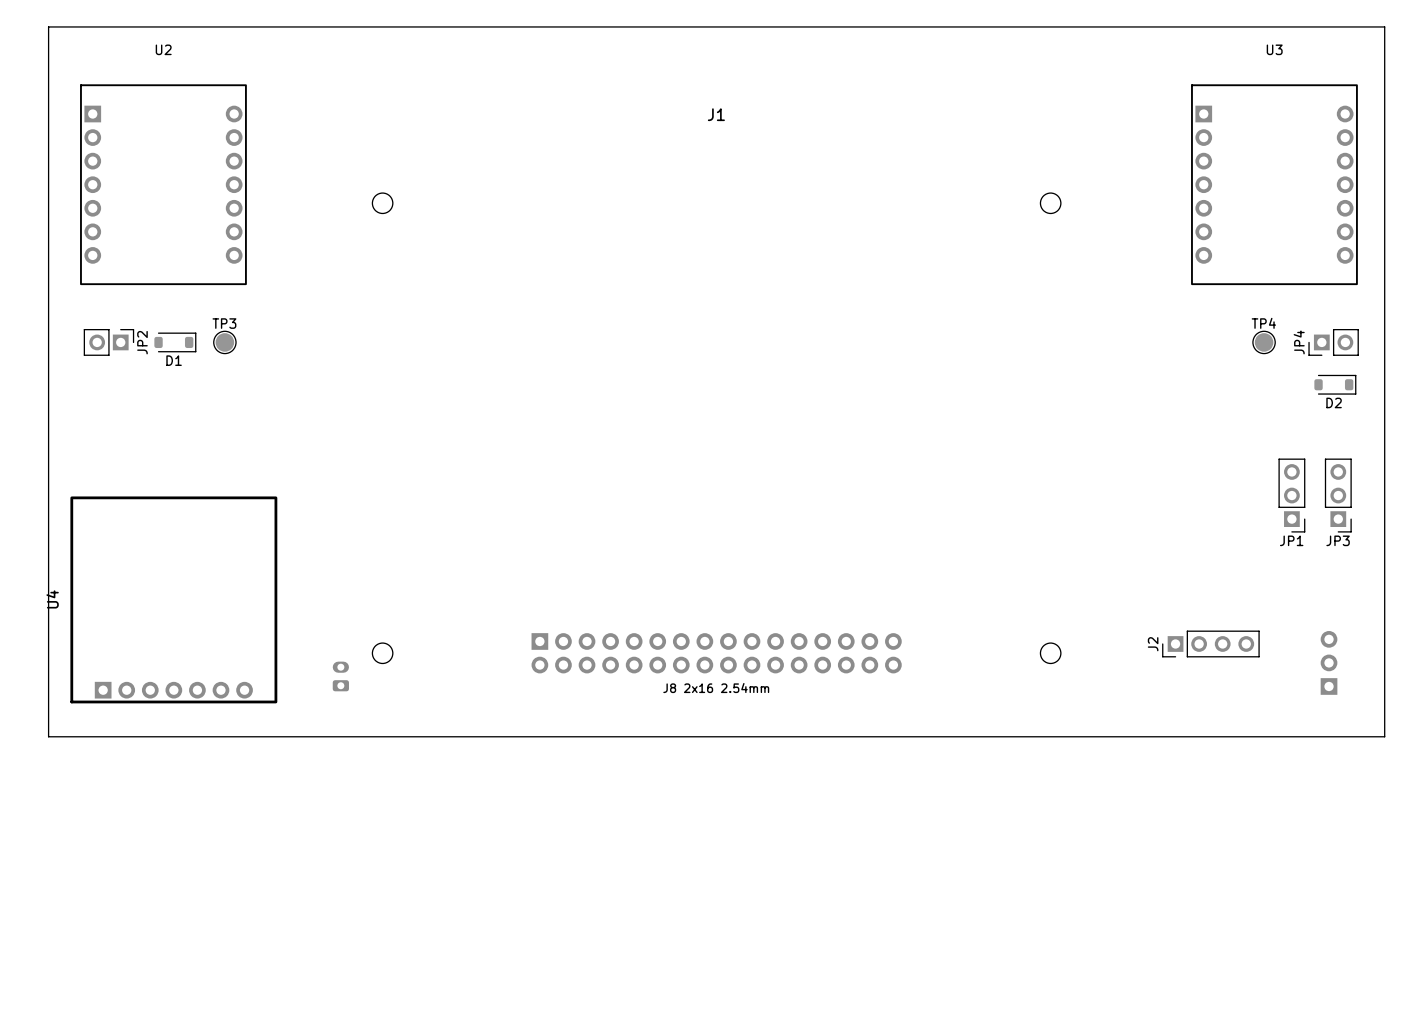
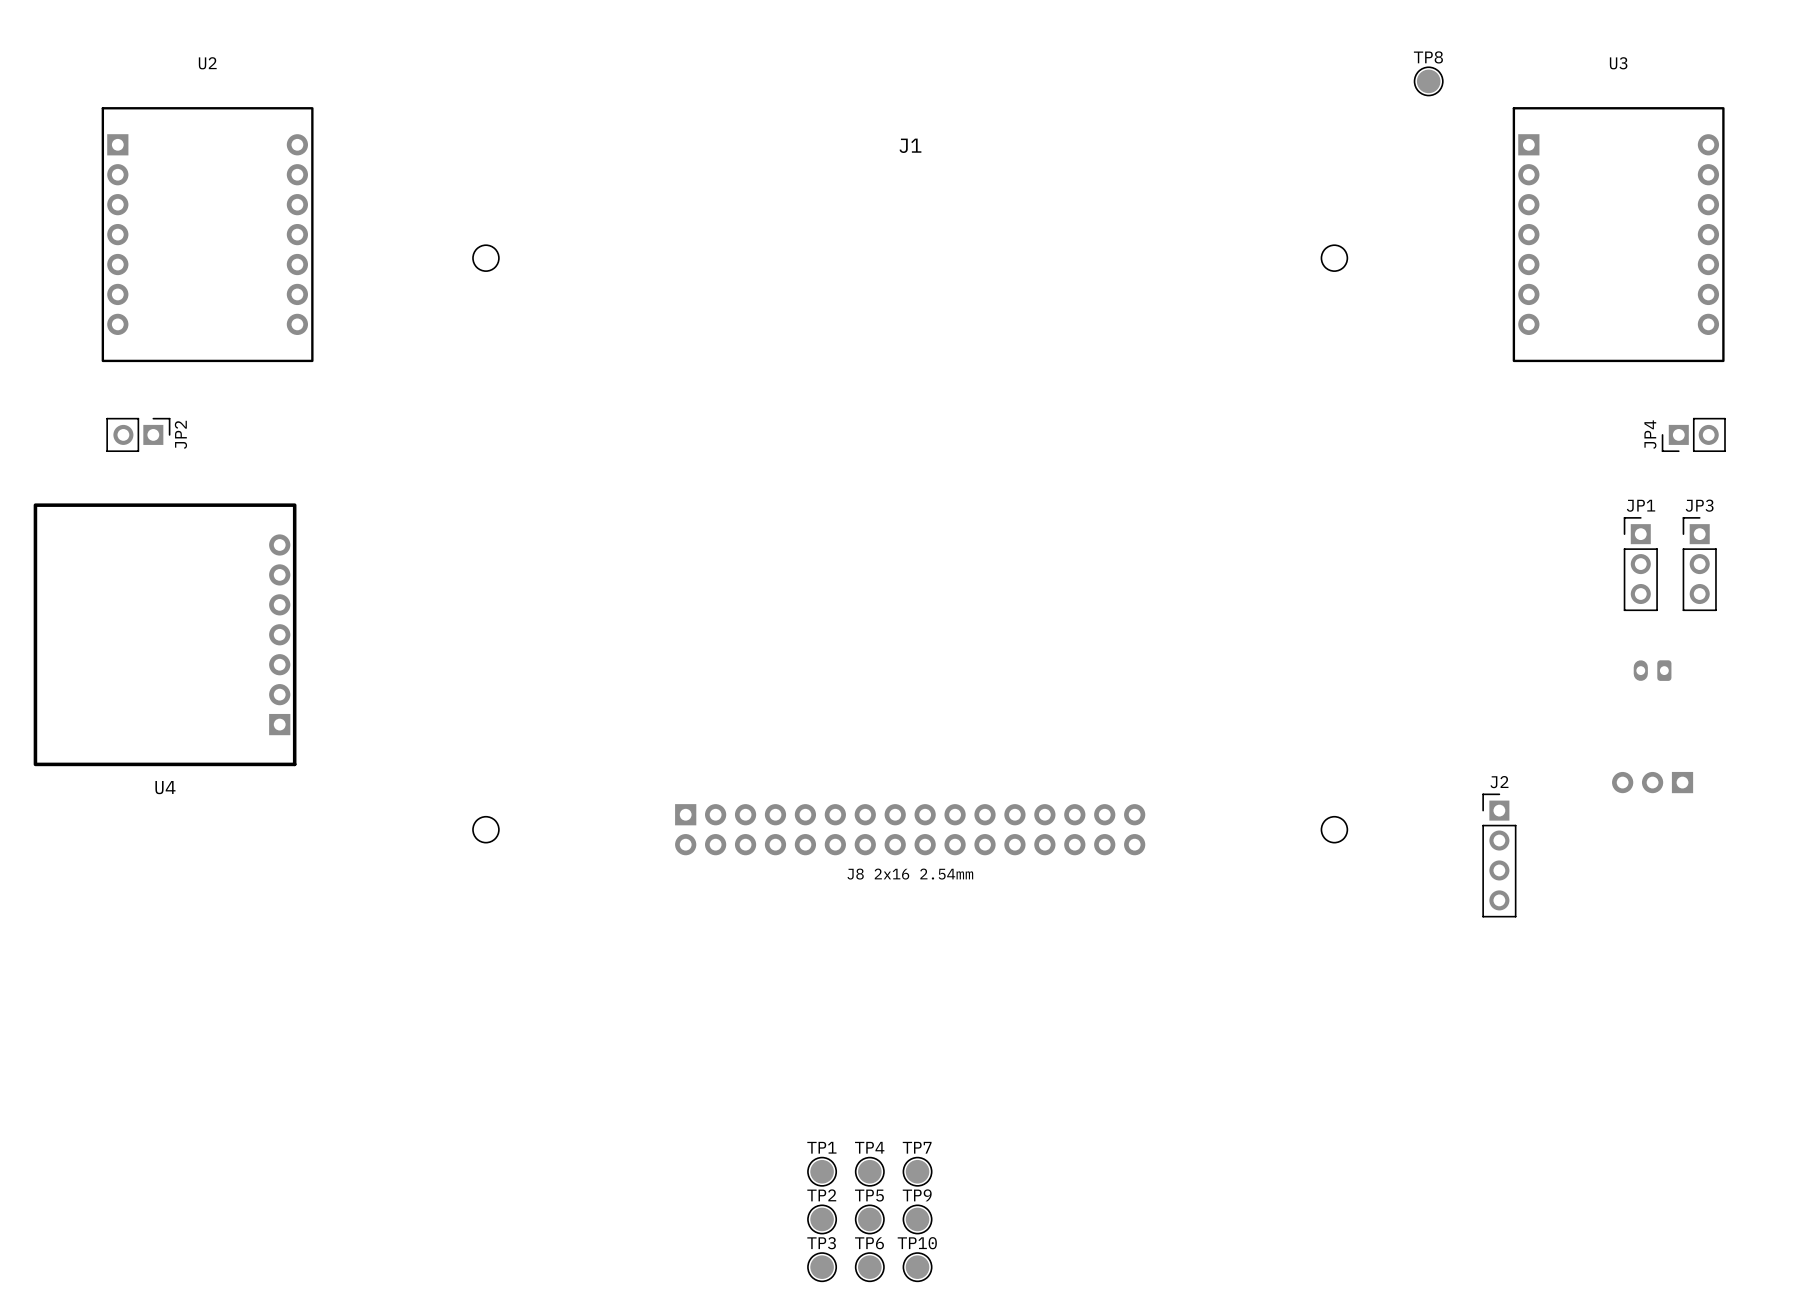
board edge: (48, 26) (1384, 26) (1384, 736) (48, 736) (48, 26) -> none
TP8: none -> (1428, 81)
D1: (175, 342) -> none
TP3 position: (224, 342) -> (822, 1267)
TP4 position: (1264, 342) -> (869, 1171)
D2: (1335, 384) -> none
JP1 rotation: 0° (1291, 495) -> 180° (1640, 564)
JP1 position: (1291, 495) -> (1640, 564)
JP3 rotation: 0° (1338, 495) -> 180° (1699, 564)
JP3 position: (1338, 495) -> (1699, 564)
part: none -> (1652, 670)
U4 rotation: 0° (173, 599) -> 90° counterclockwise (165, 634)
J2 rotation: 0° (1210, 643) -> 90° clockwise (1499, 855)
part rotation: 0° (1329, 662) -> 90° counterclockwise (1652, 782)
part position: (1329, 662) -> (1652, 782)
part: (340, 676) -> none
TP1: none -> (822, 1171)
TP7: none -> (917, 1171)
TP2: none -> (822, 1219)
TP5: none -> (869, 1219)
TP9: none -> (917, 1219)
TP6: none -> (869, 1267)
TP10: none -> (917, 1267)

